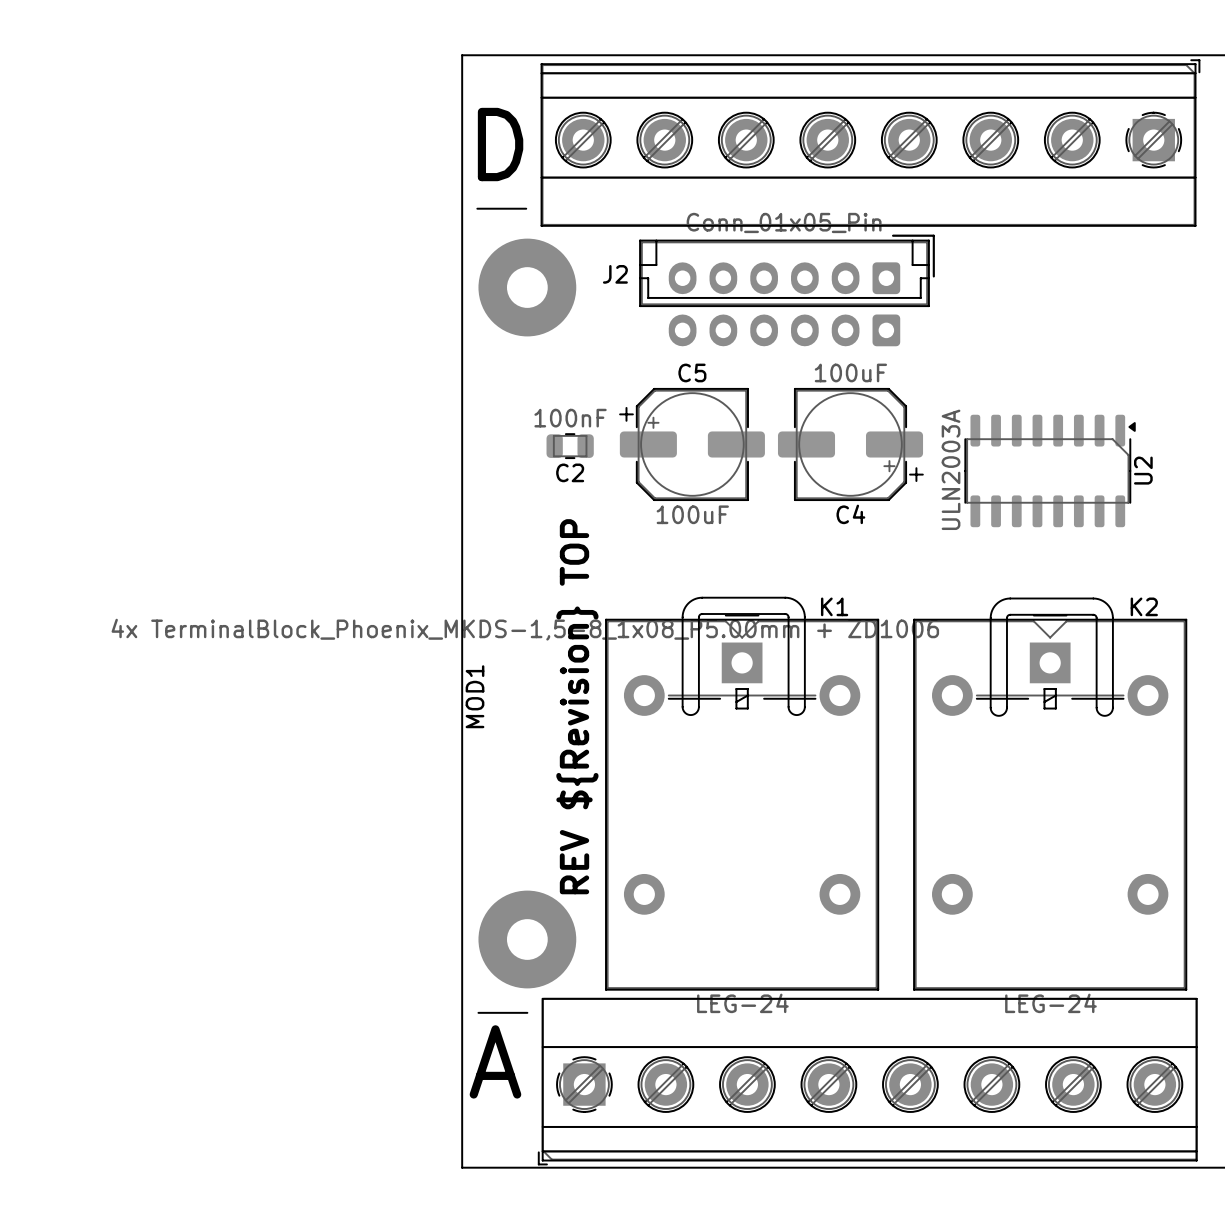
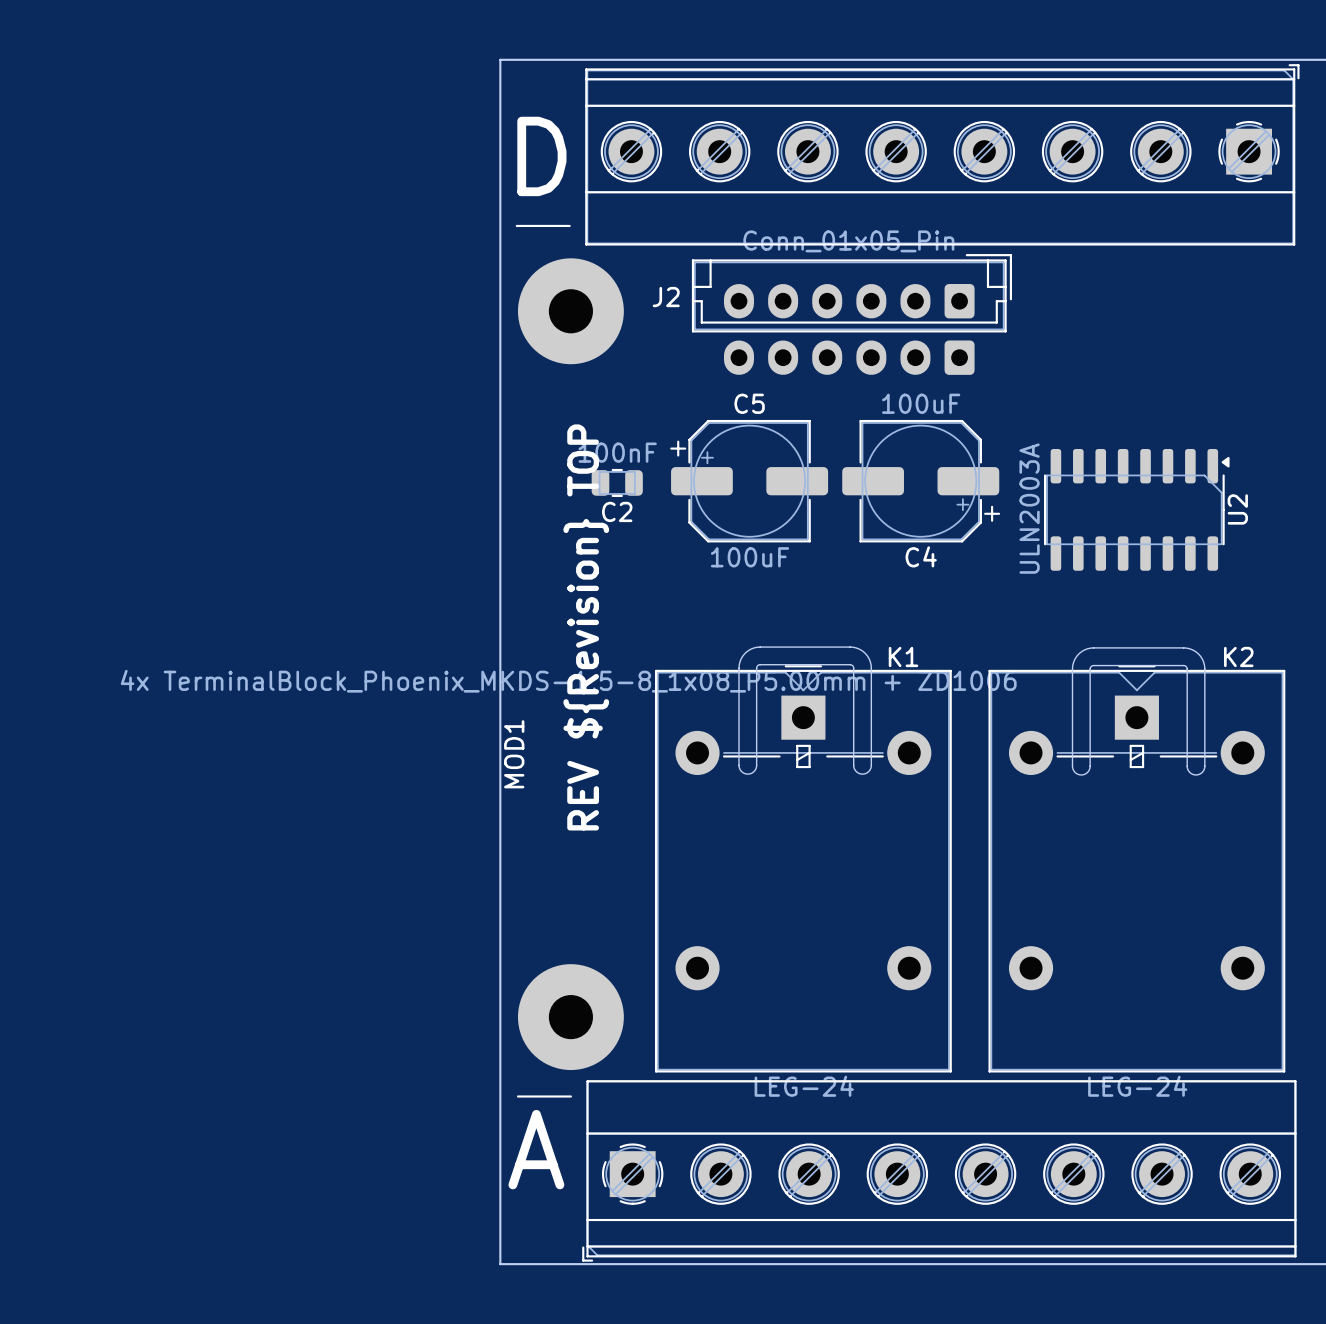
text position: REV ${Revision} TOP (577, 706) -> REV ${Revision} TOP (586, 627)

